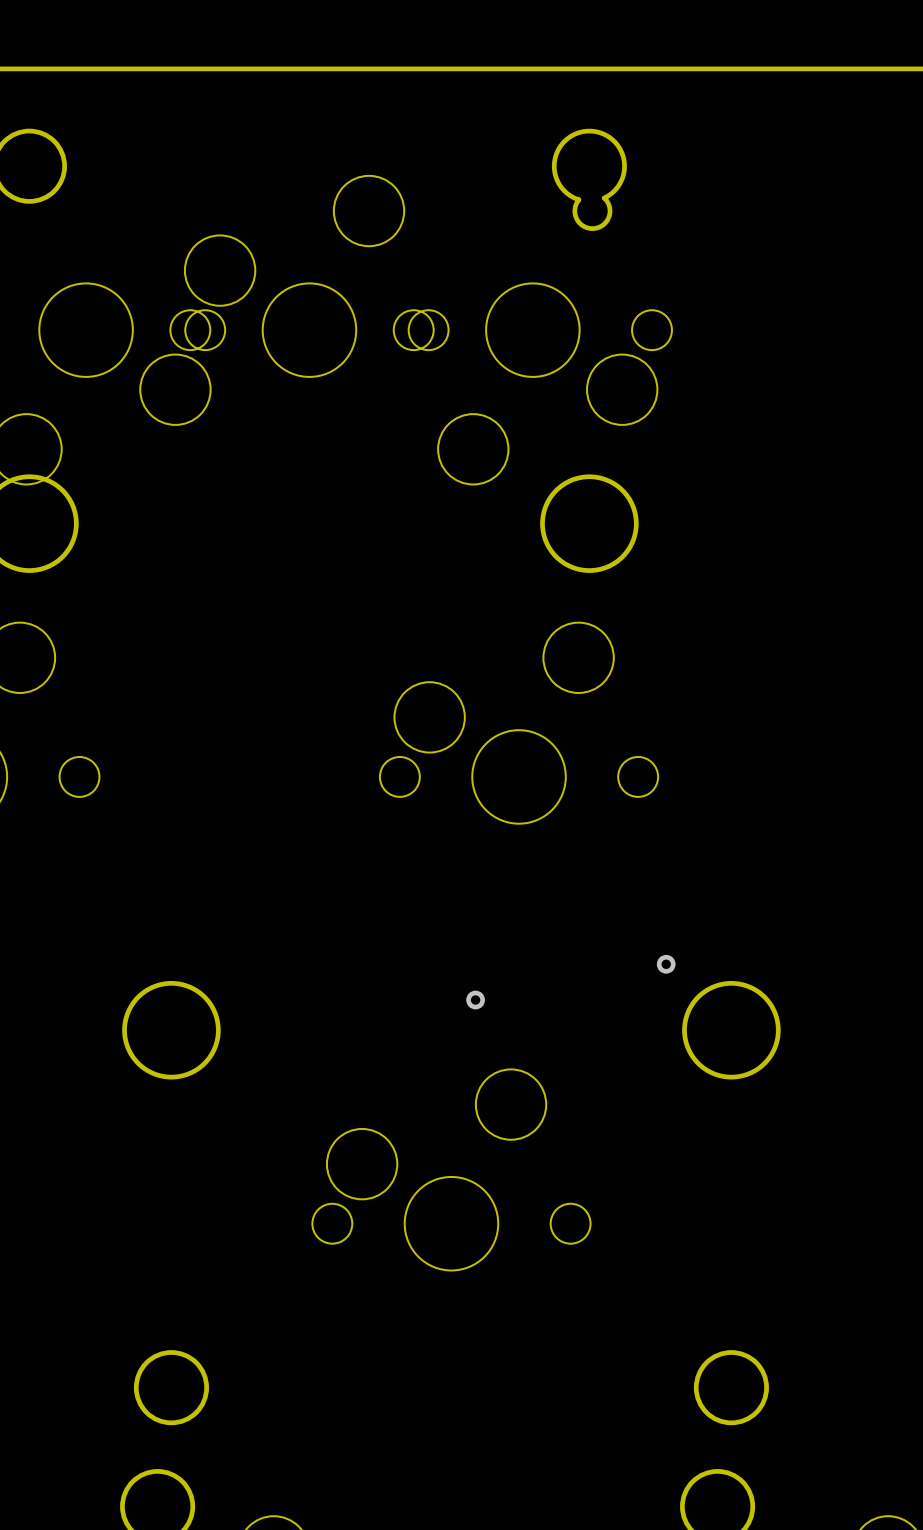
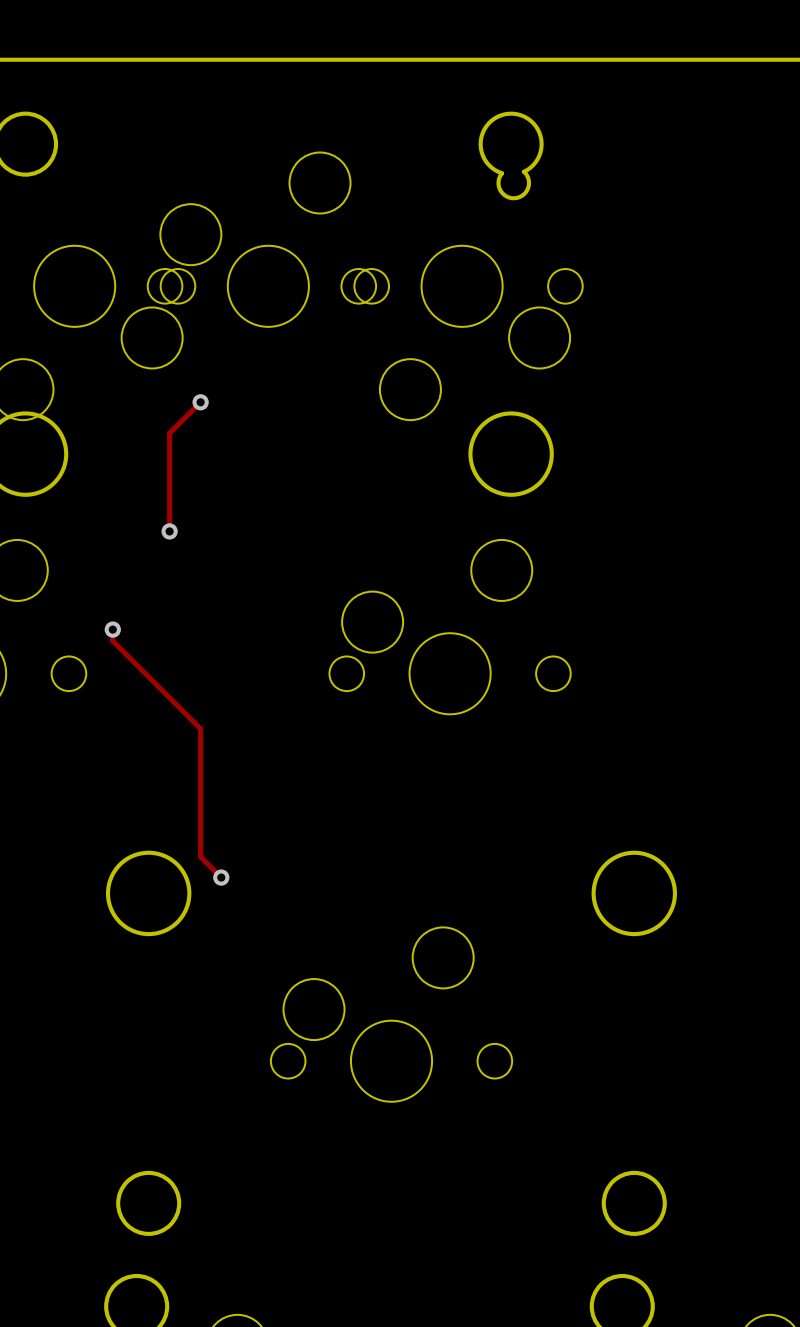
track: none -> (200, 402) (169, 433) (169, 531)
via: none -> (200, 402)
via: none -> (169, 531)
track: none -> (112, 629) (112, 641) (200, 728) (200, 856) (221, 877)
via: none -> (112, 629)
via: (666, 964) -> none
via: (475, 1000) -> none
via: none -> (221, 877)

